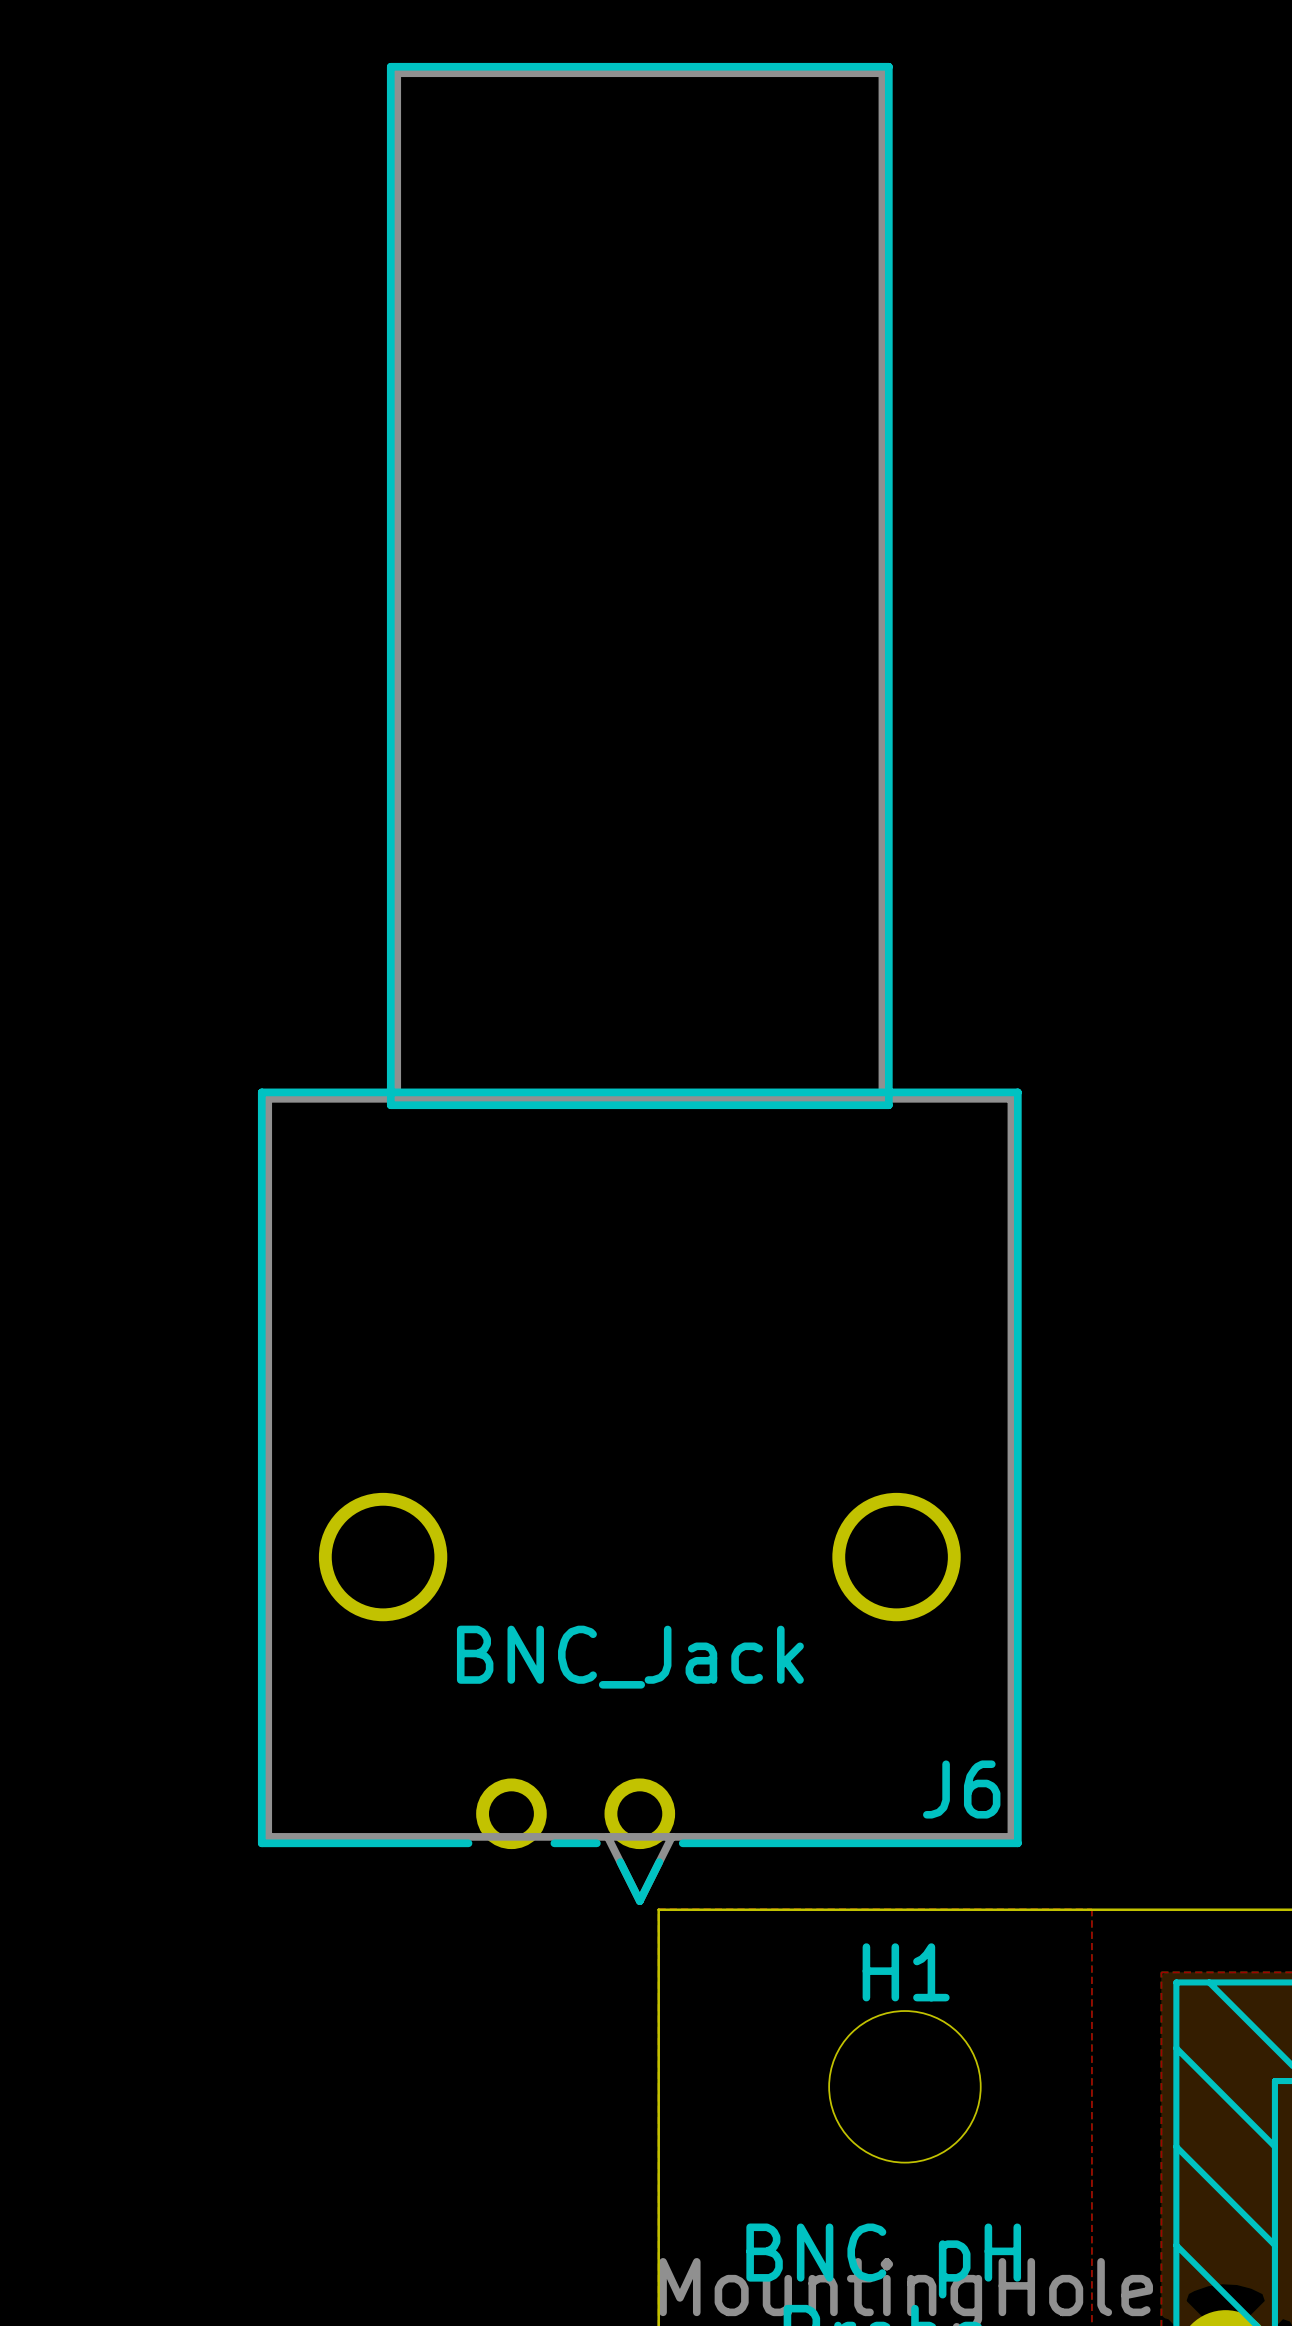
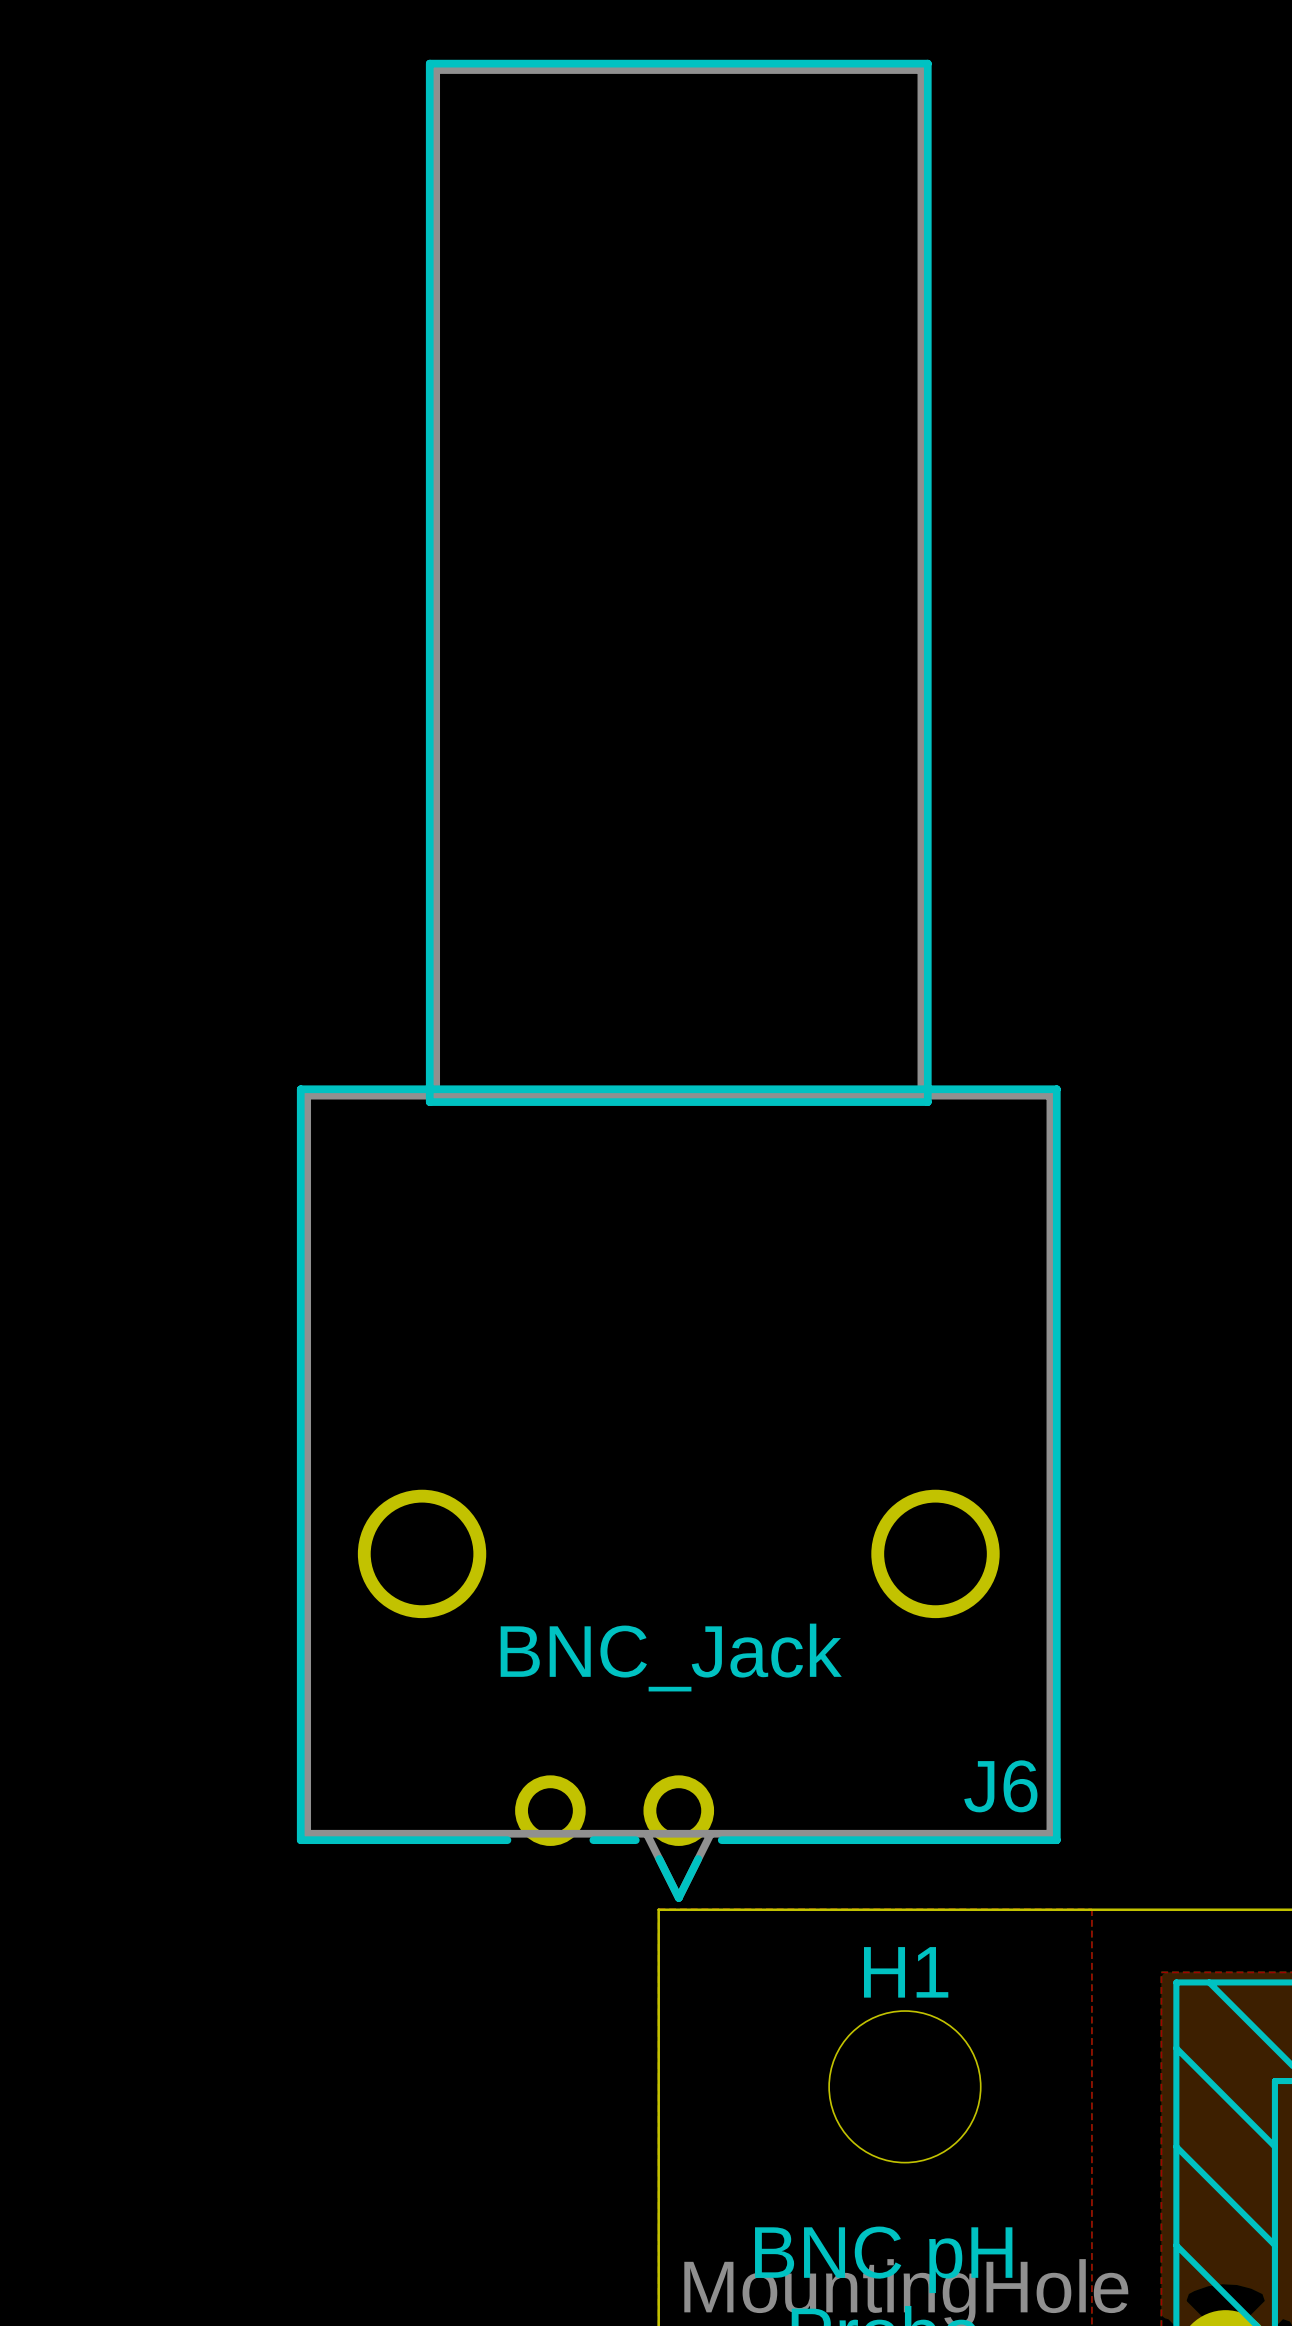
J6 position: (639, 983) -> (678, 980)

